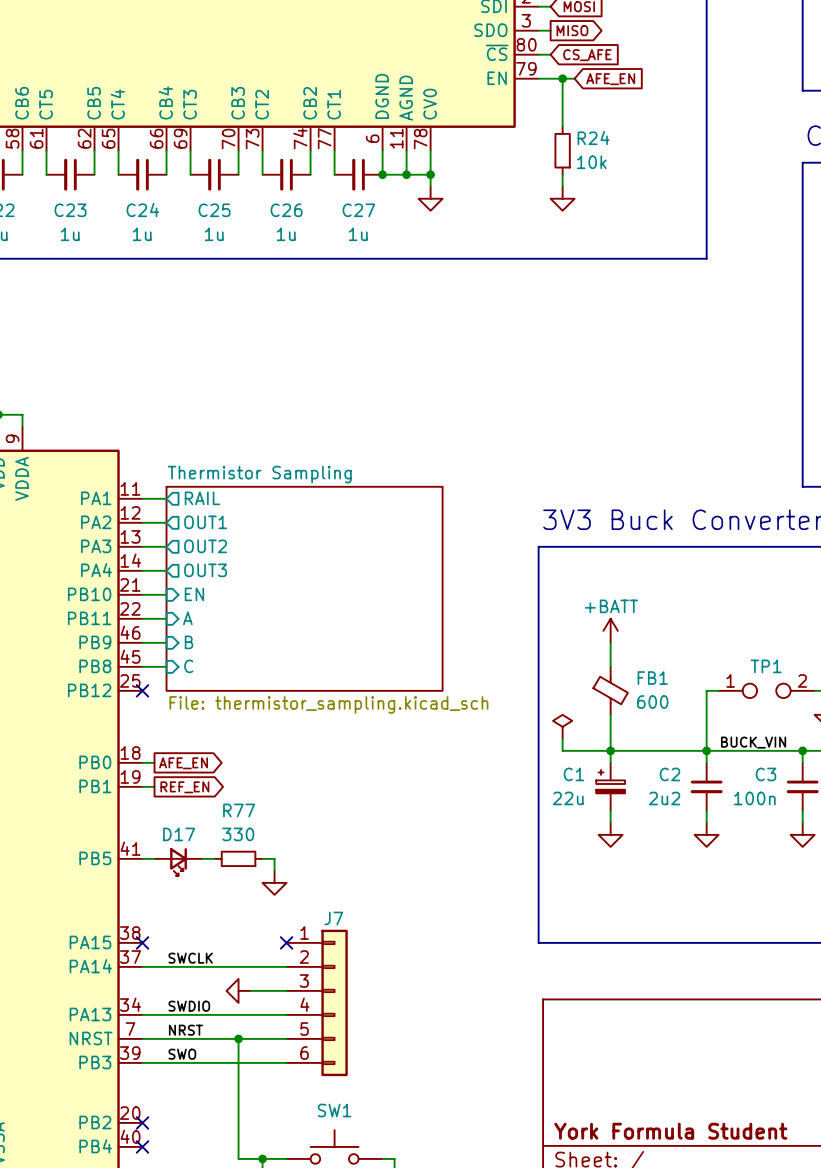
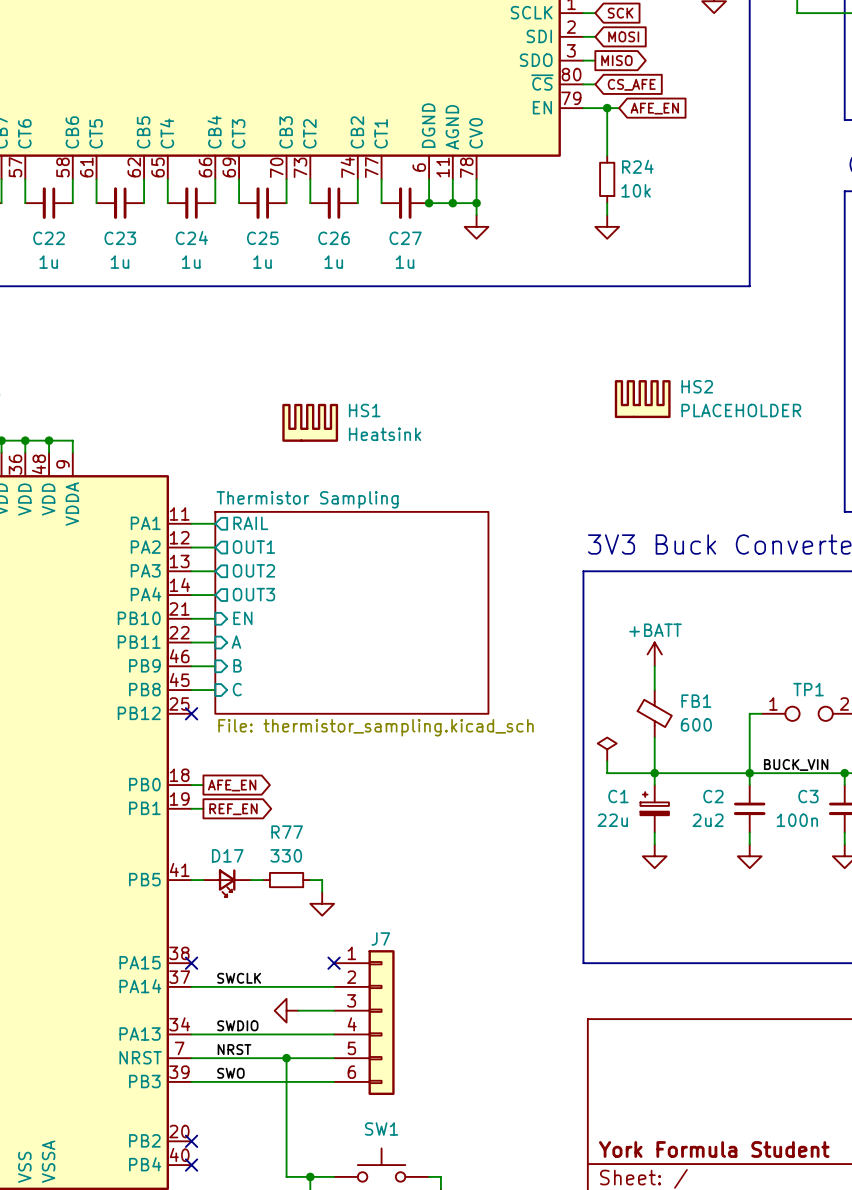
HS2: none -> PLACEHOLDER (642, 399)
HS1: none -> Heatsink (310, 422)

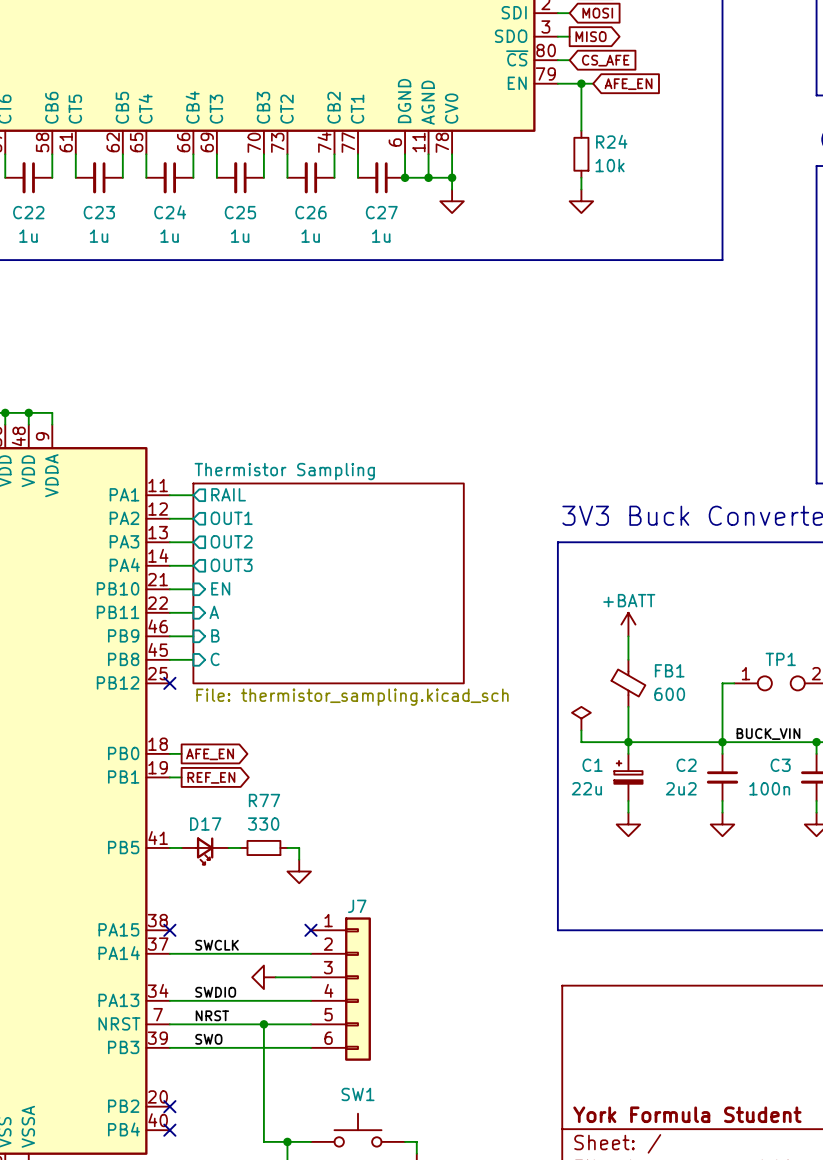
HS2: PLACEHOLDER (642, 399) -> none
HS1: Heatsink (310, 422) -> none

